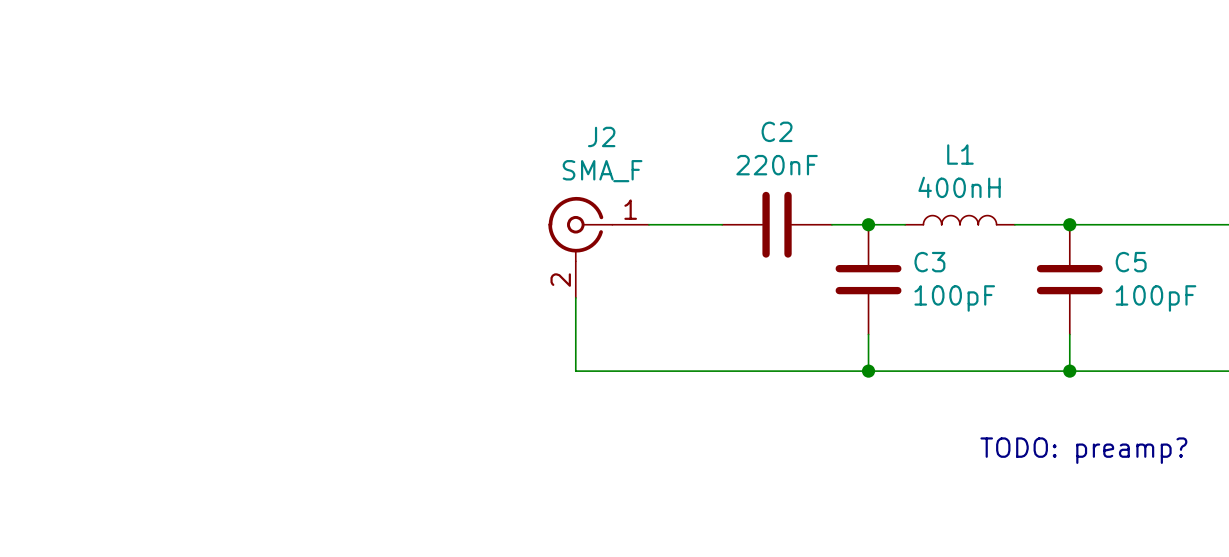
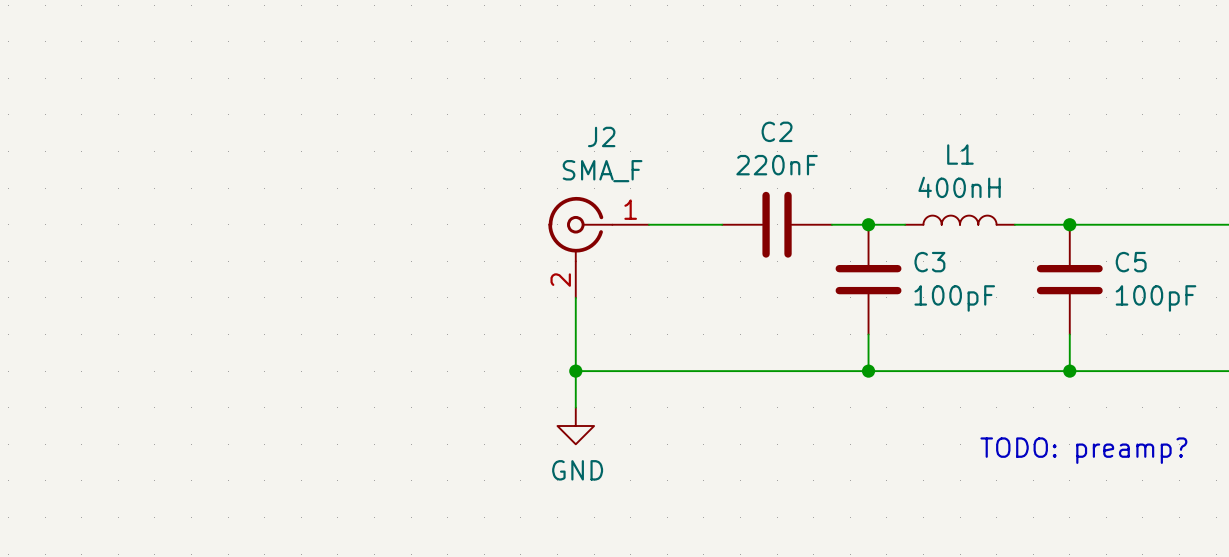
wire: none -> (575, 371) (575, 407)
junction: none -> (575, 371)
power symbol: none -> GND (575, 426)

